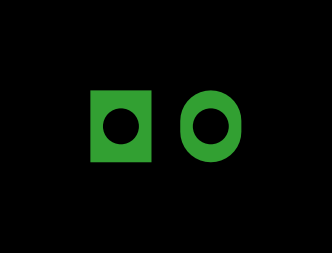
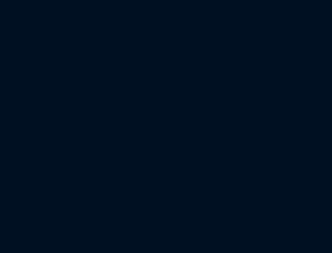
part: (165, 126) -> none

